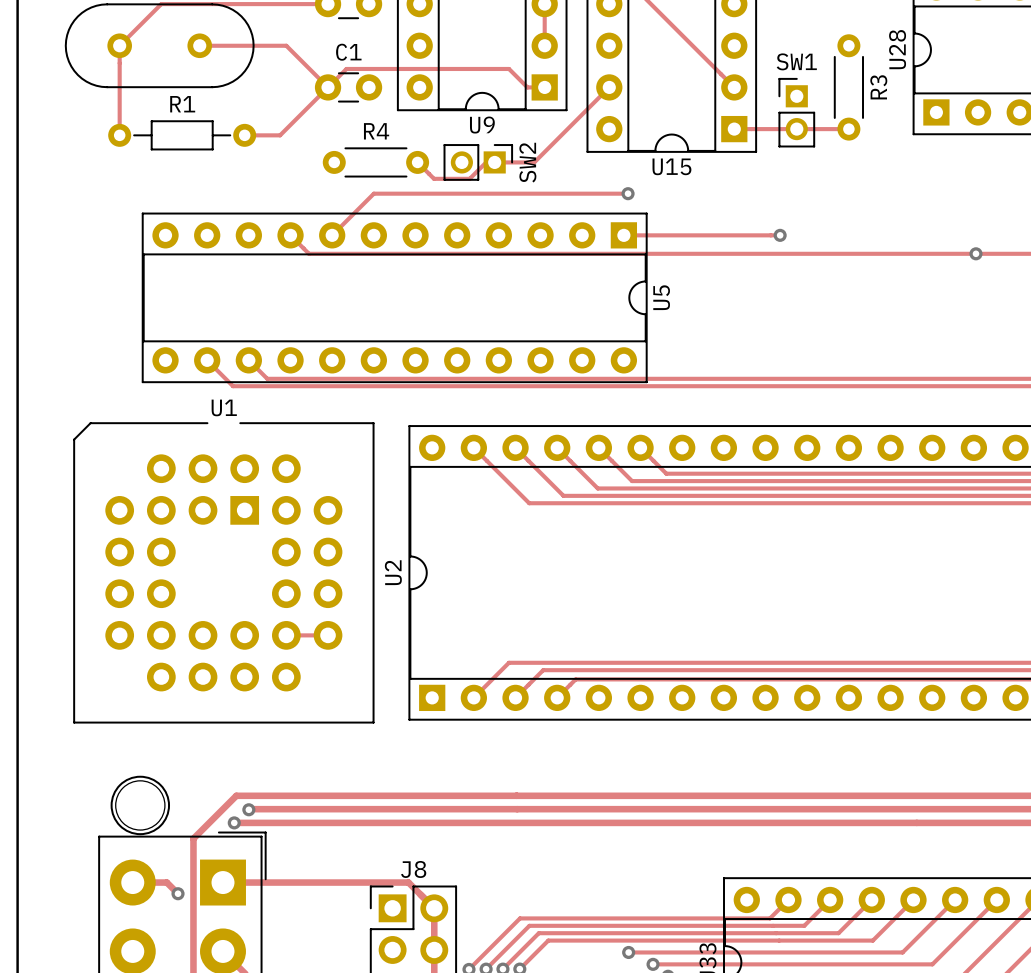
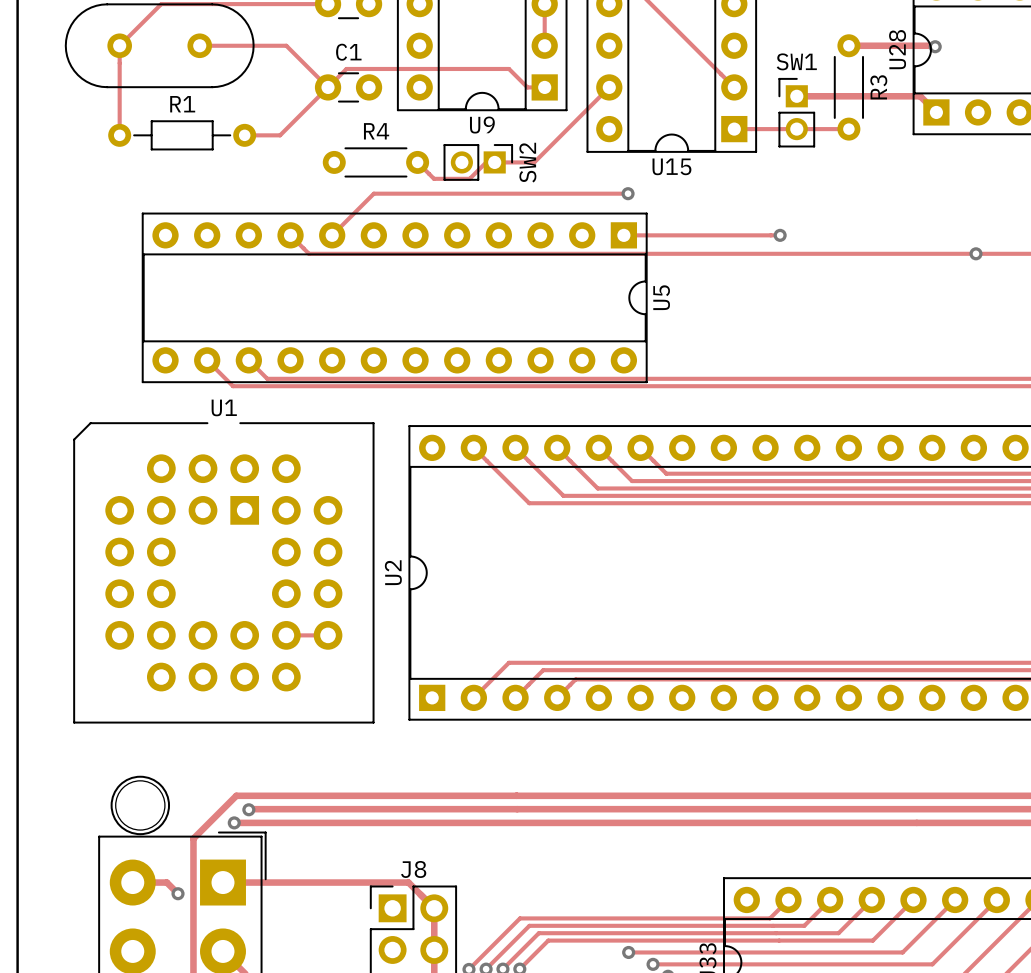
track: none -> (848, 45) (935, 46)
via: none -> (935, 46)
track: none -> (796, 96) (920, 96) (936, 112)

